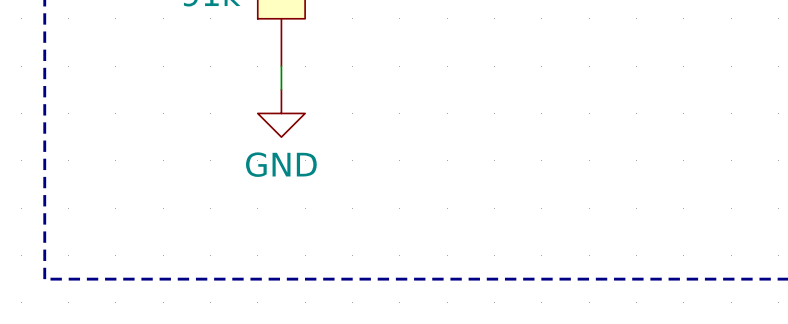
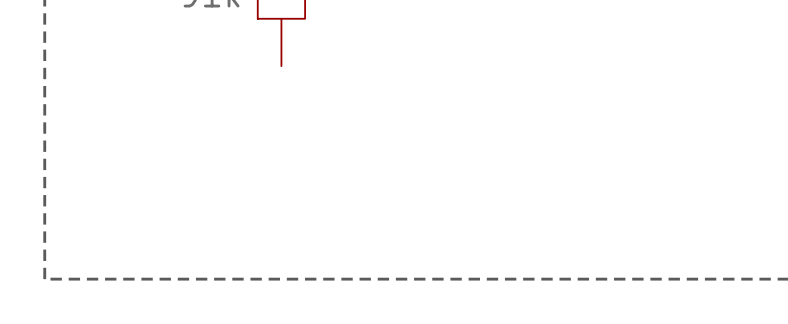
wire: (281, 66) (281, 89) -> none
power symbol: GND (281, 113) -> none

